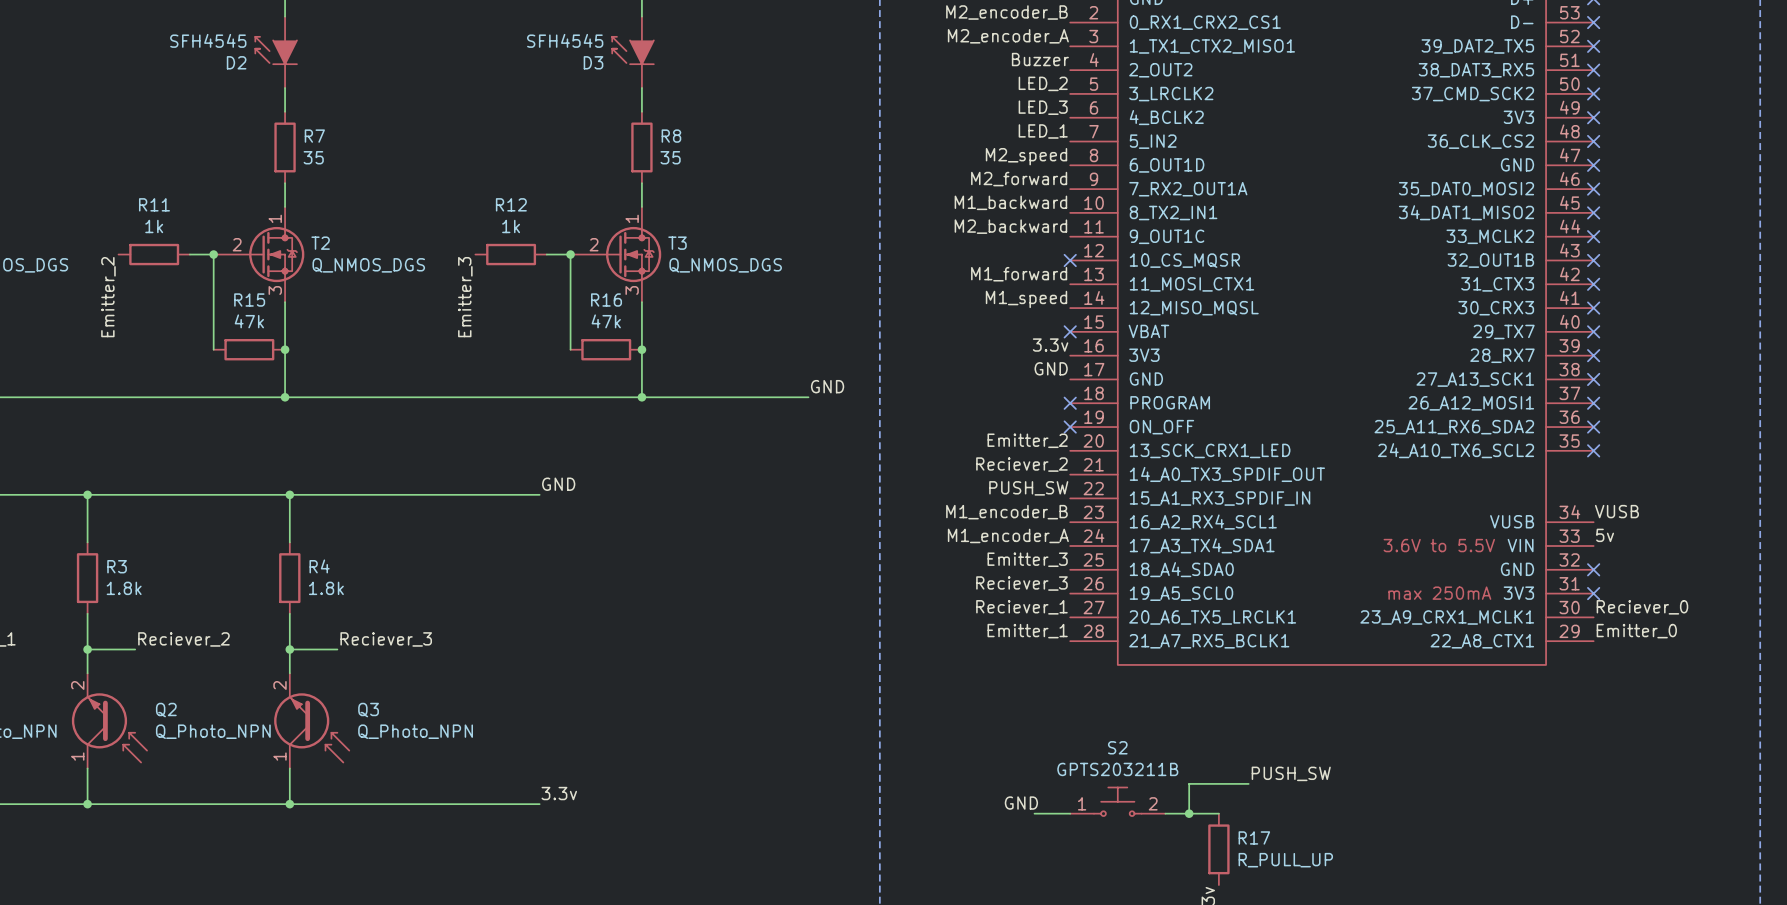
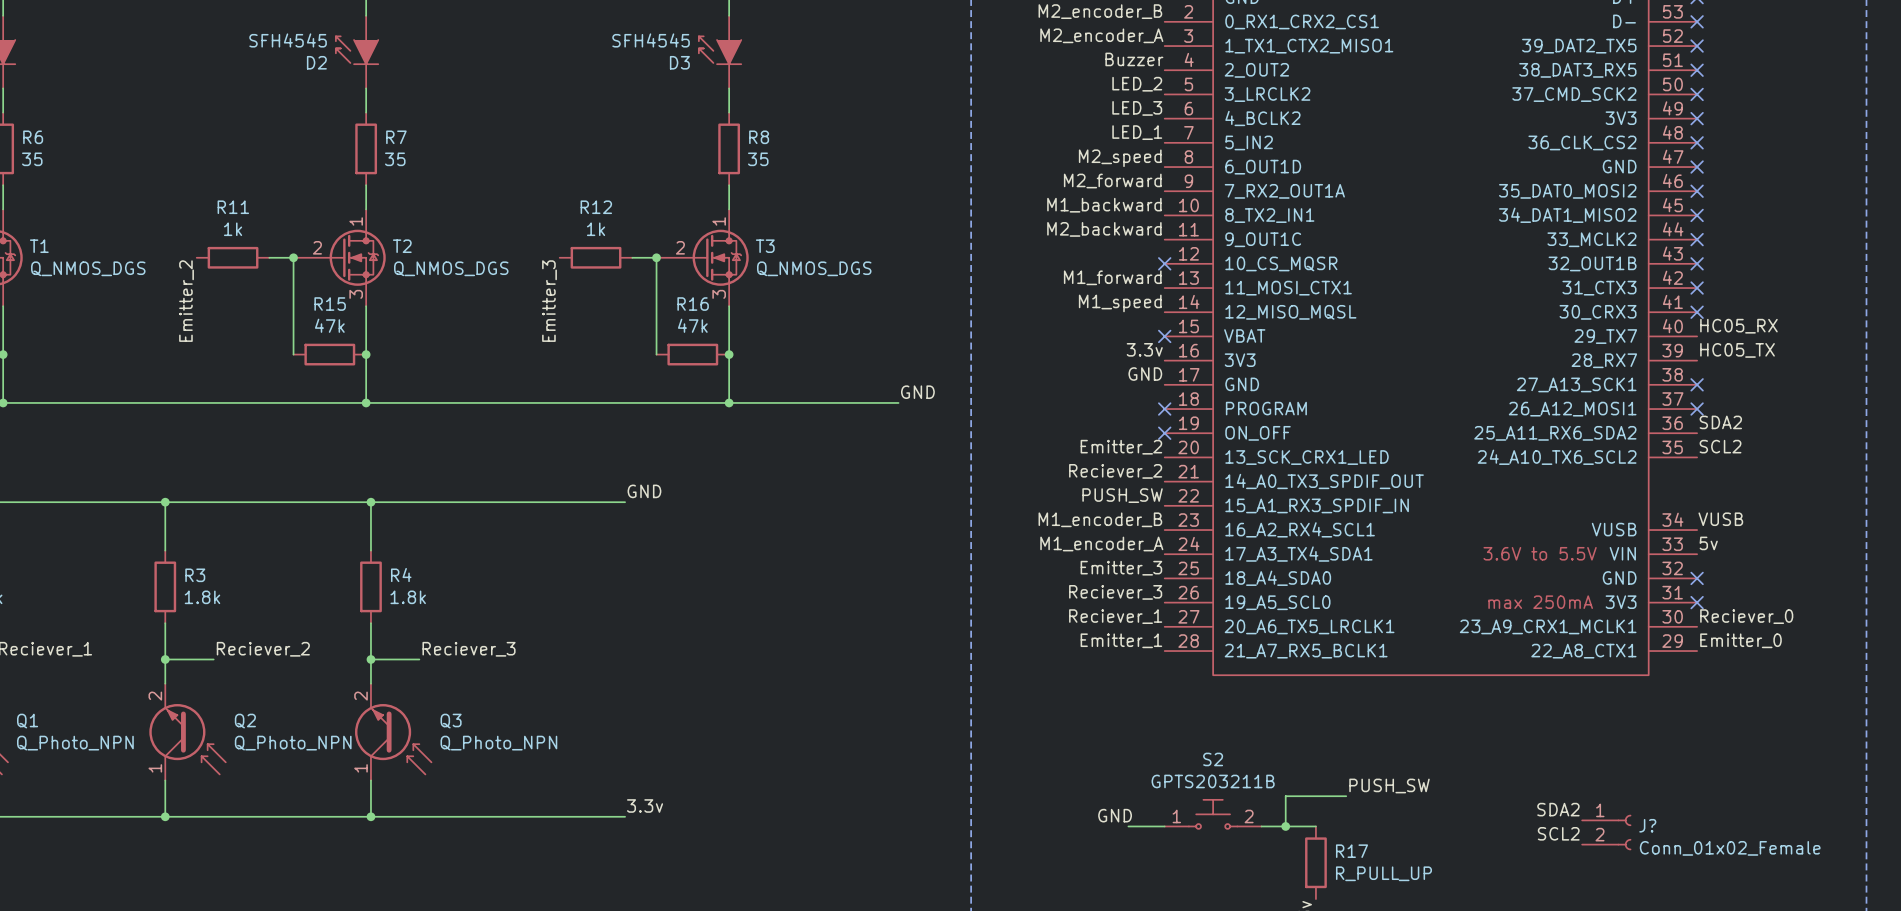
label: none -> HC05_RX (1738, 326)
no-connect mark: (1593, 331) -> none
label: none -> HC05_TX (1737, 350)
no-connect mark: (1593, 355) -> none
label: none -> SDA2 (1720, 422)
no-connect mark: (1593, 427) -> none
label: none -> SCL2 (1720, 446)
no-connect mark: (1593, 450) -> none
label: none -> SDA2 (1558, 809)
J?: none -> Conn_01x02_Female (1606, 832)
label: none -> SCL2 (1558, 833)

